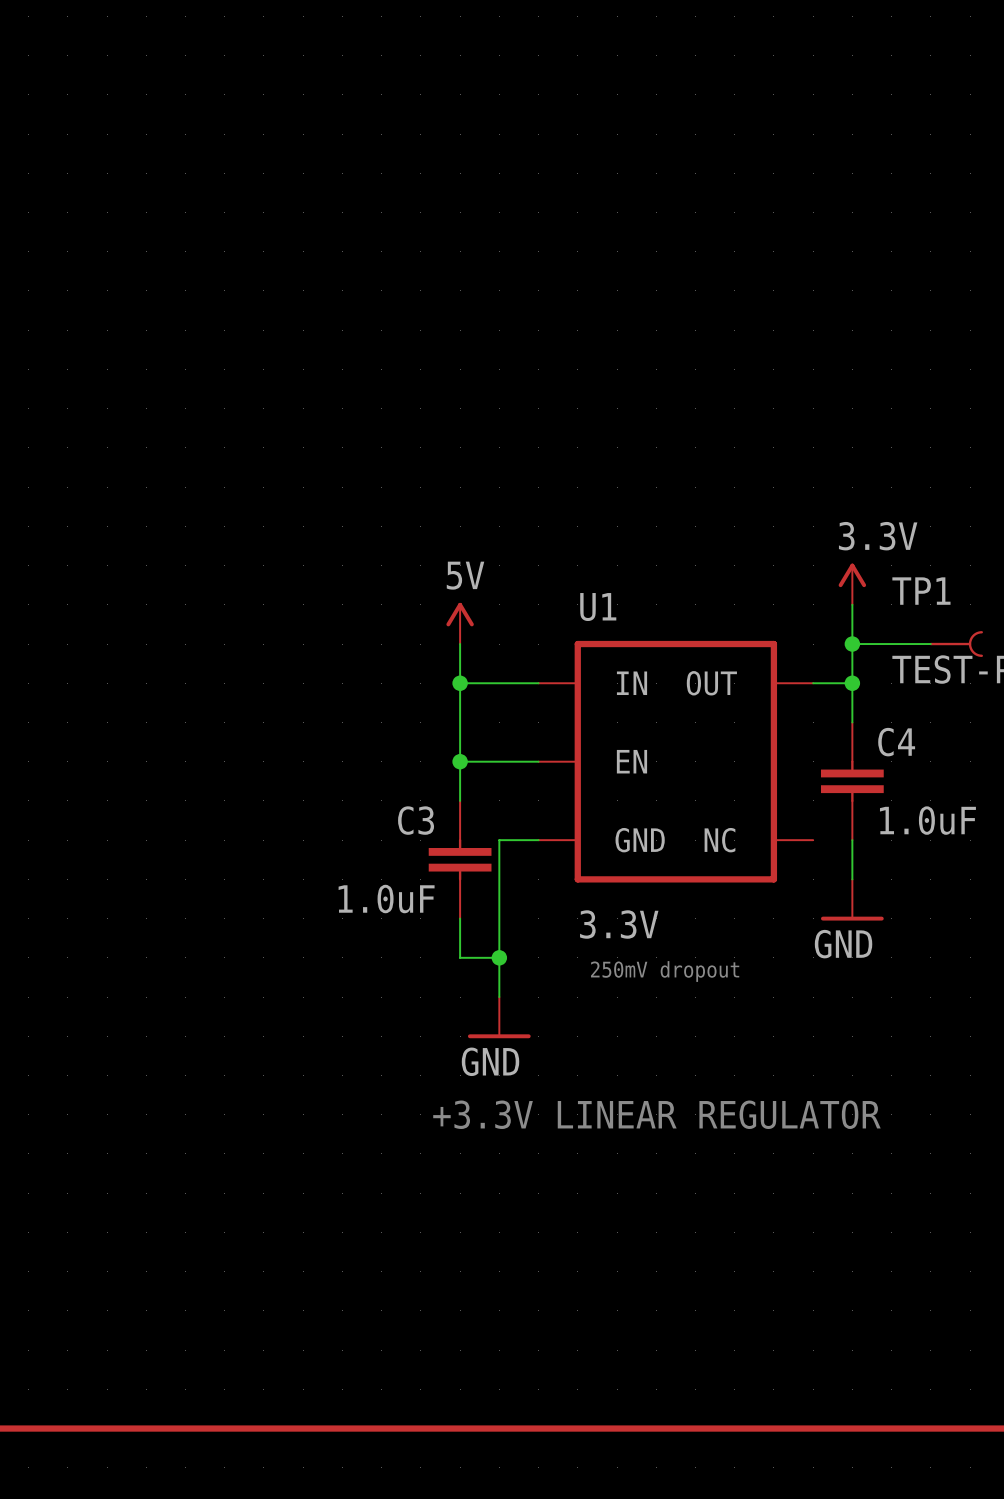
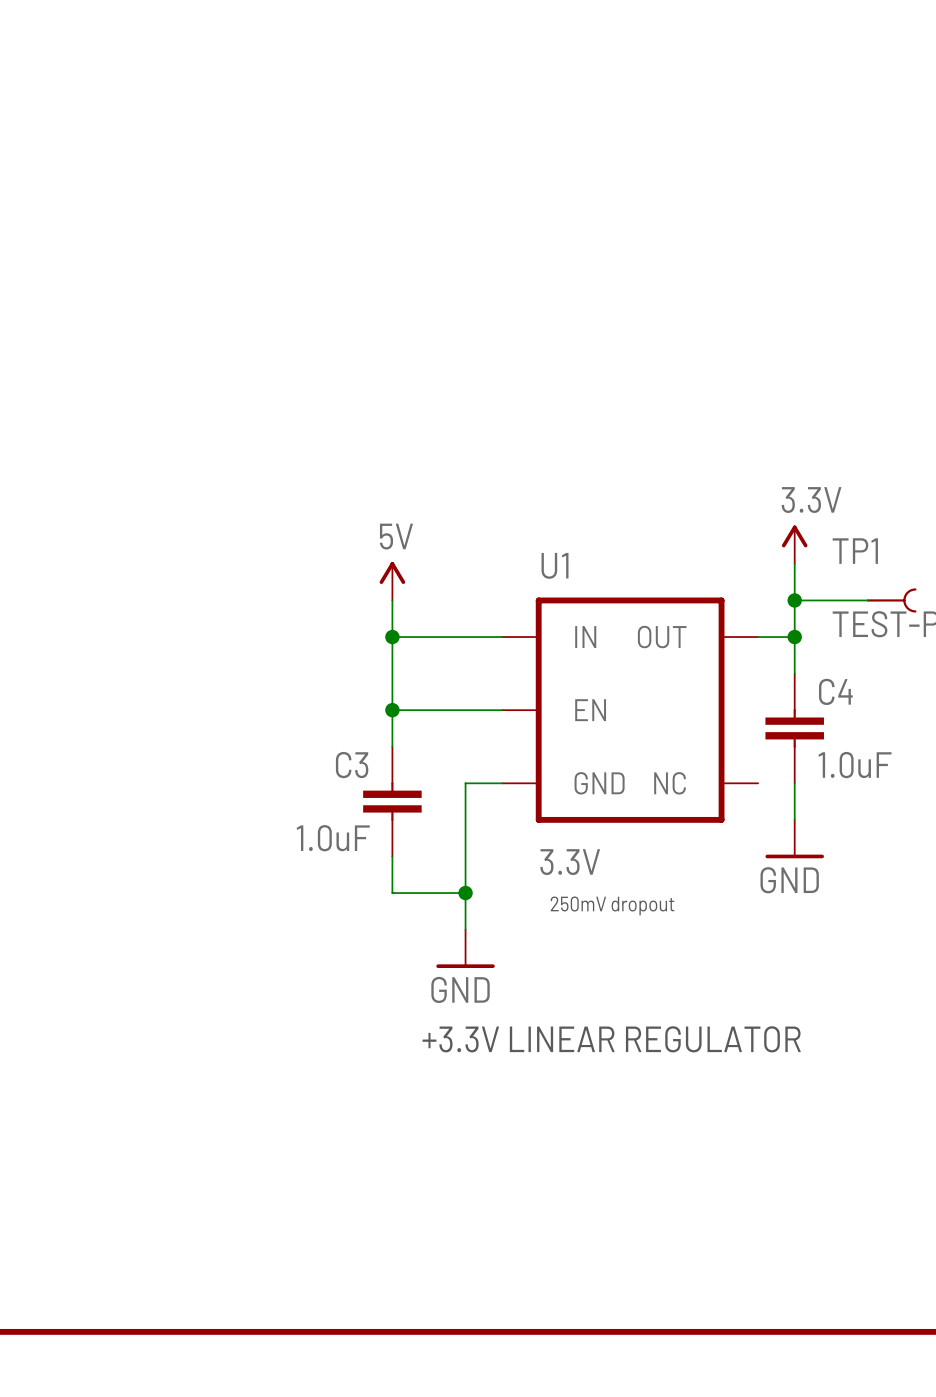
power symbol position: 5V (460, 623) -> 5V (392, 581)
wire: (460, 644) (460, 800) -> (392, 600) (392, 746)
wire: none -> (392, 637) (428, 637)
junction position: (460, 683) -> (392, 637)
wire: none -> (392, 710) (428, 710)
junction position: (460, 761) -> (392, 710)
C3 position: (460, 859) -> (392, 801)
wire: (460, 918) (460, 957) -> (392, 856) (392, 893) (428, 893)

